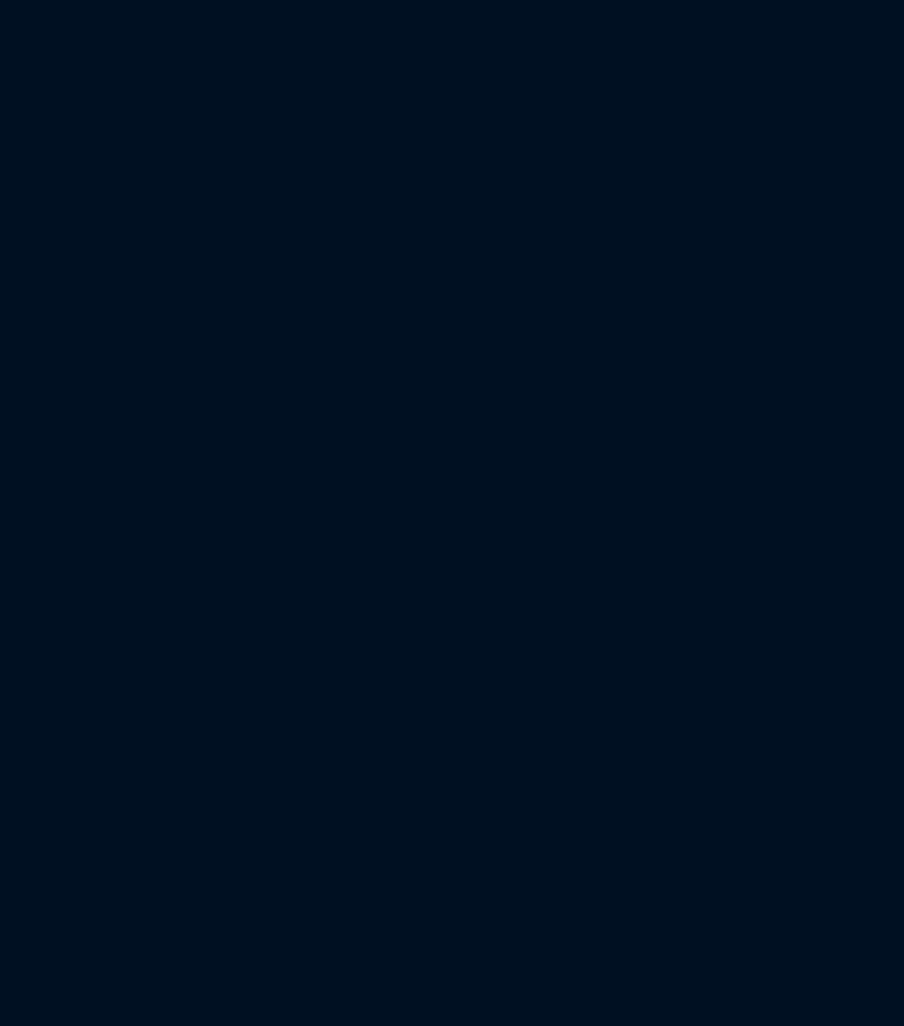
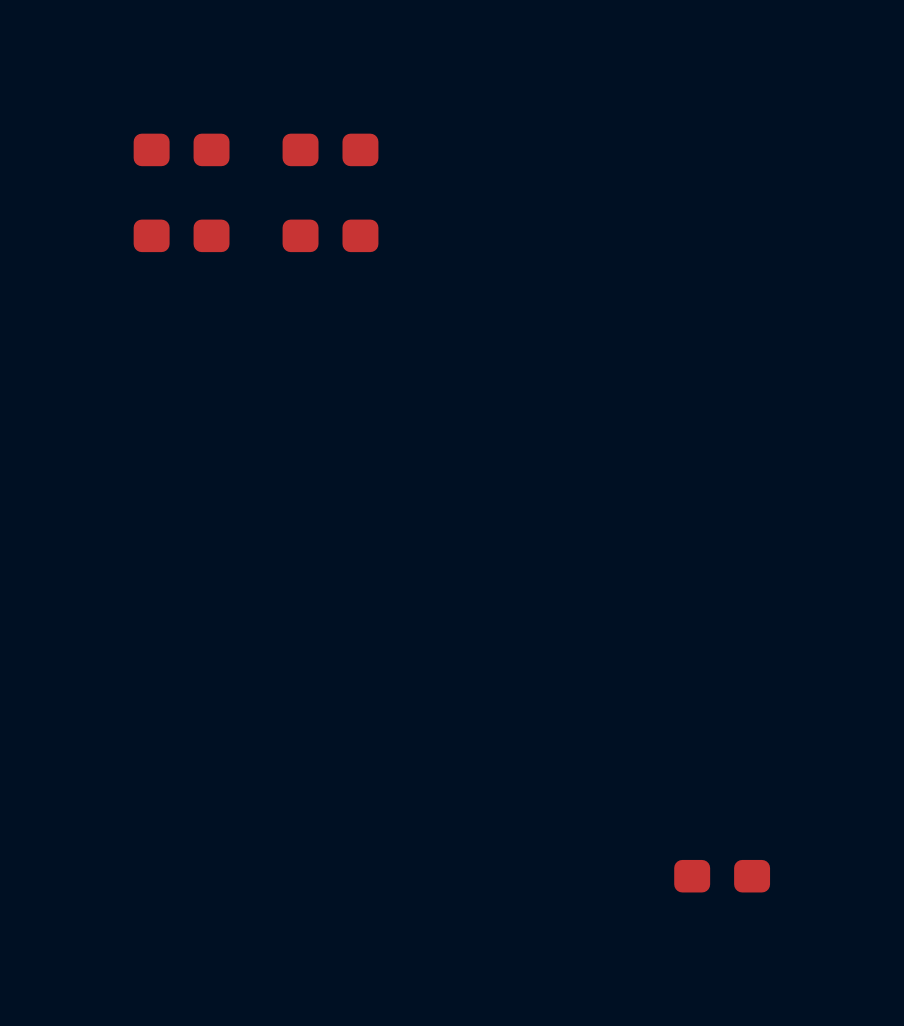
part: none -> (181, 149)
part: none -> (330, 149)
part: none -> (181, 235)
part: none -> (330, 235)
part: none -> (722, 876)

